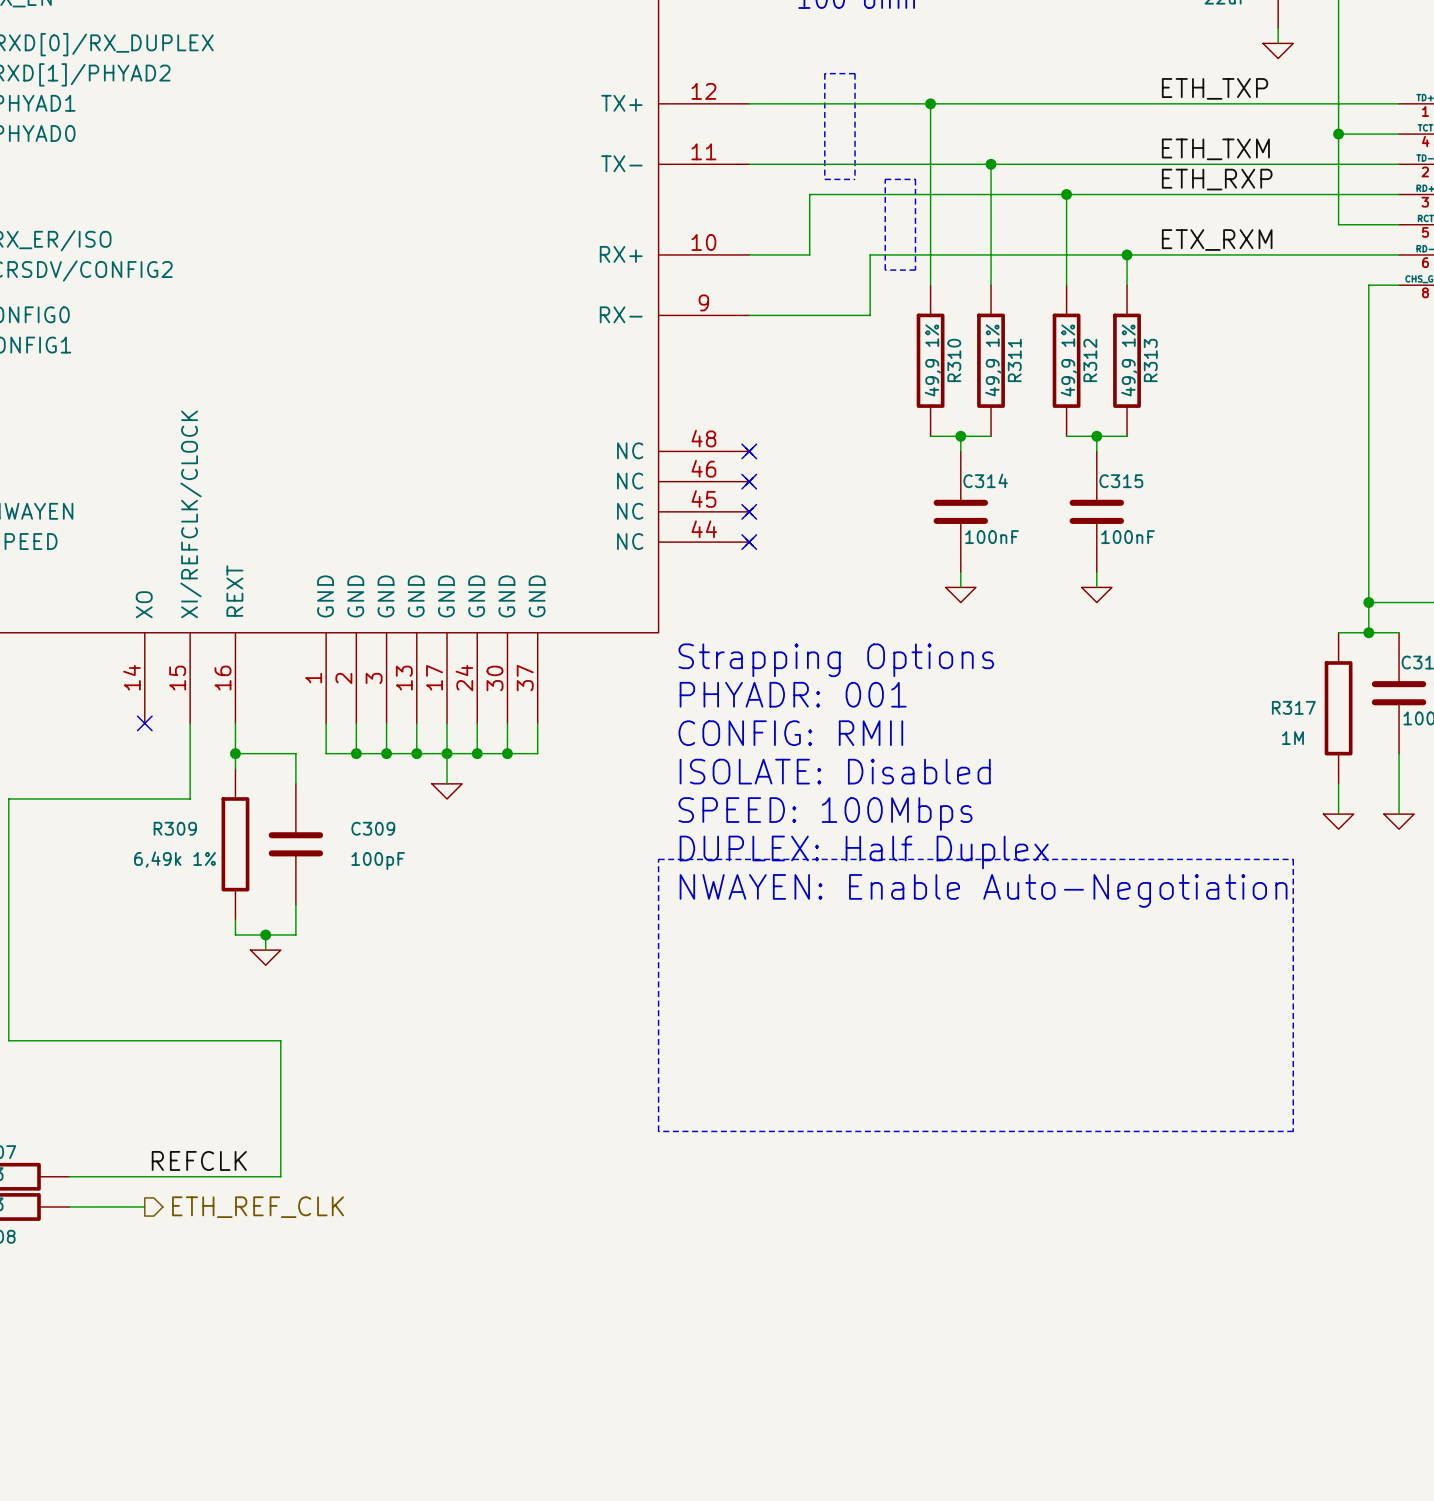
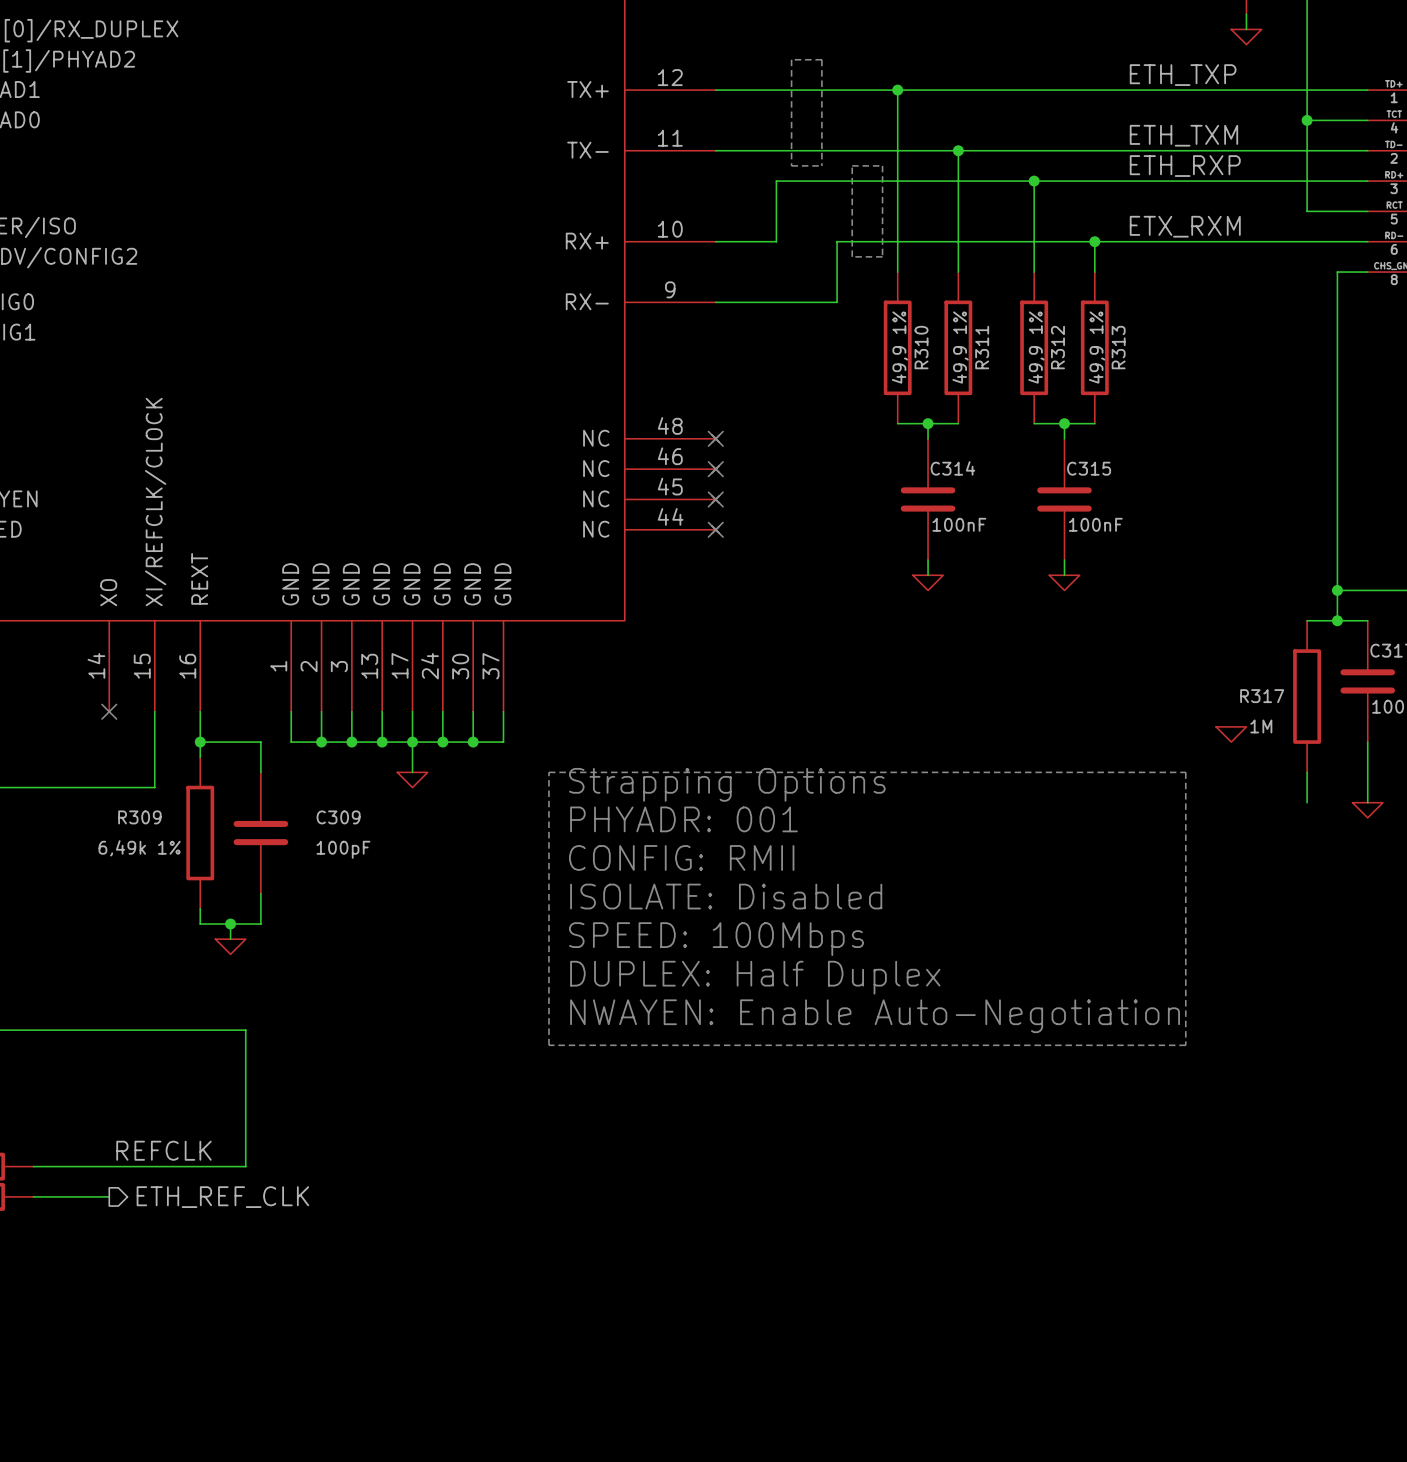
text position: Strapping Options (836, 660) -> Strapping Options (727, 784)
text position: PHYADR: 001 (793, 694) -> PHYADR: 001 (683, 819)
text position: CONFIG: RMII (790, 733) -> CONFIG: RMII (681, 857)
text position: ISOLATE: Disabled (835, 771) -> ISOLATE: Disabled (726, 896)
text position: SPEED: 100Mbps (825, 814) -> SPEED: 100Mbps (716, 939)
power symbol position: (1338, 821) -> (1231, 734)
text position: DUPLEX: Half Duplex (864, 852) -> DUPLEX: Half Duplex (755, 977)
line: (658, 859) (1293, 859) (1293, 1131) (658, 1131) (658, 859) -> (548, 772) (1185, 772) (1185, 1045) (548, 1045) (548, 772)
text position: NWAYEN: Enable Auto-Negotiation (983, 890) -> NWAYEN: Enable Auto-Negotiation (875, 1016)

